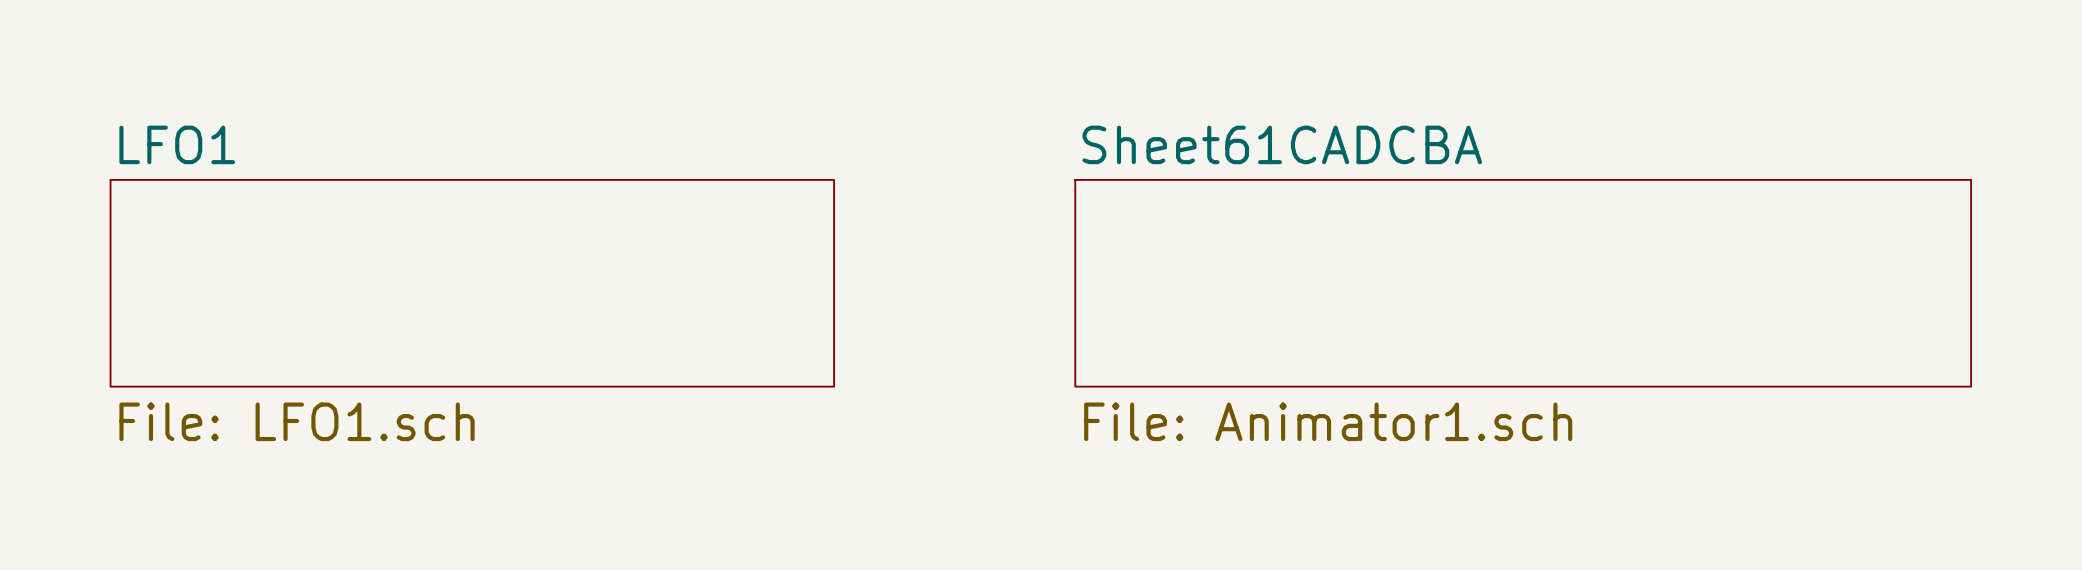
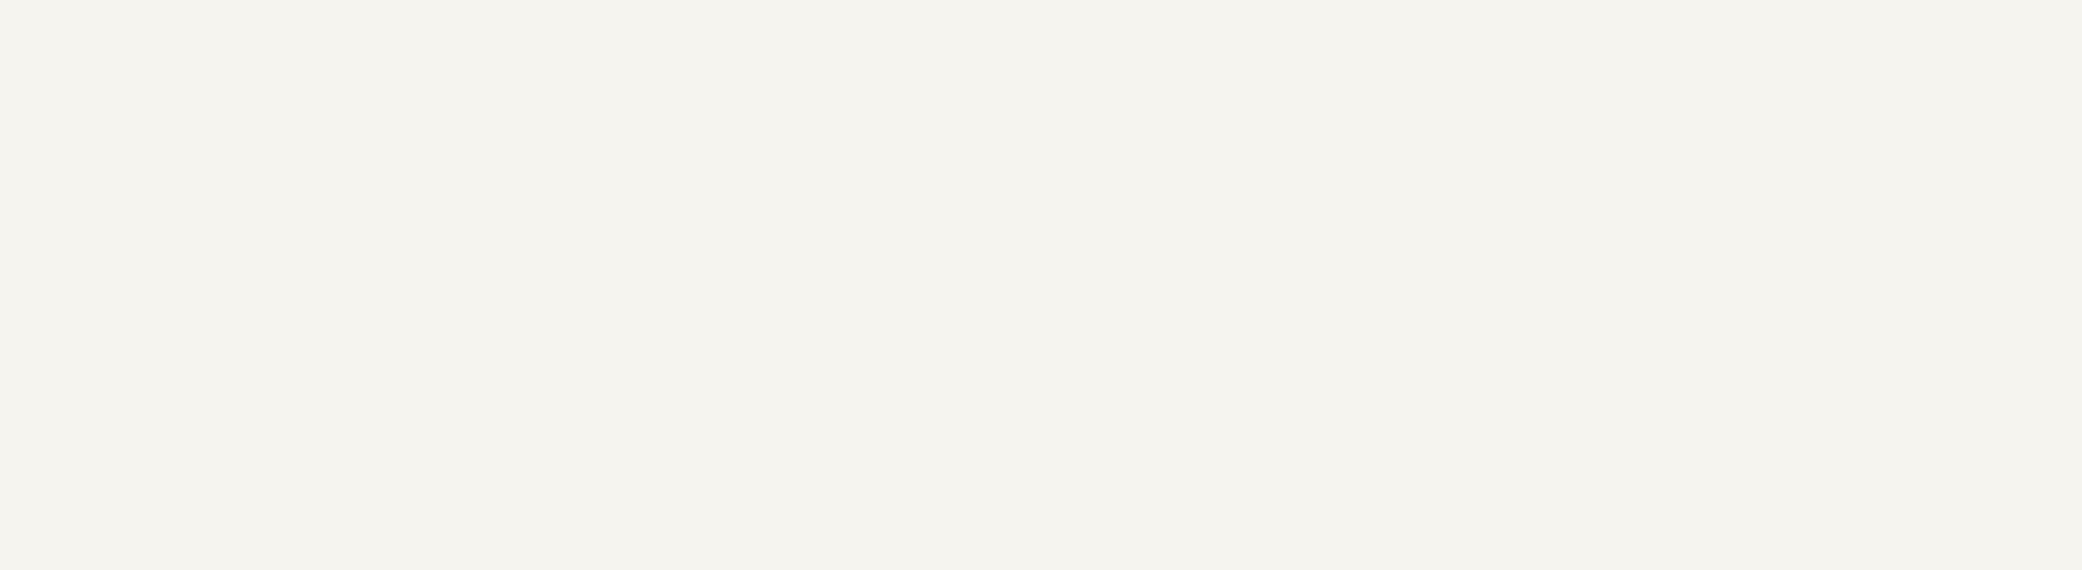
sheet LFO1: File: LFO1.sch (472, 283) -> none
sheet Sheet61CADCBA: File: Animator1.sch (1523, 283) -> none

